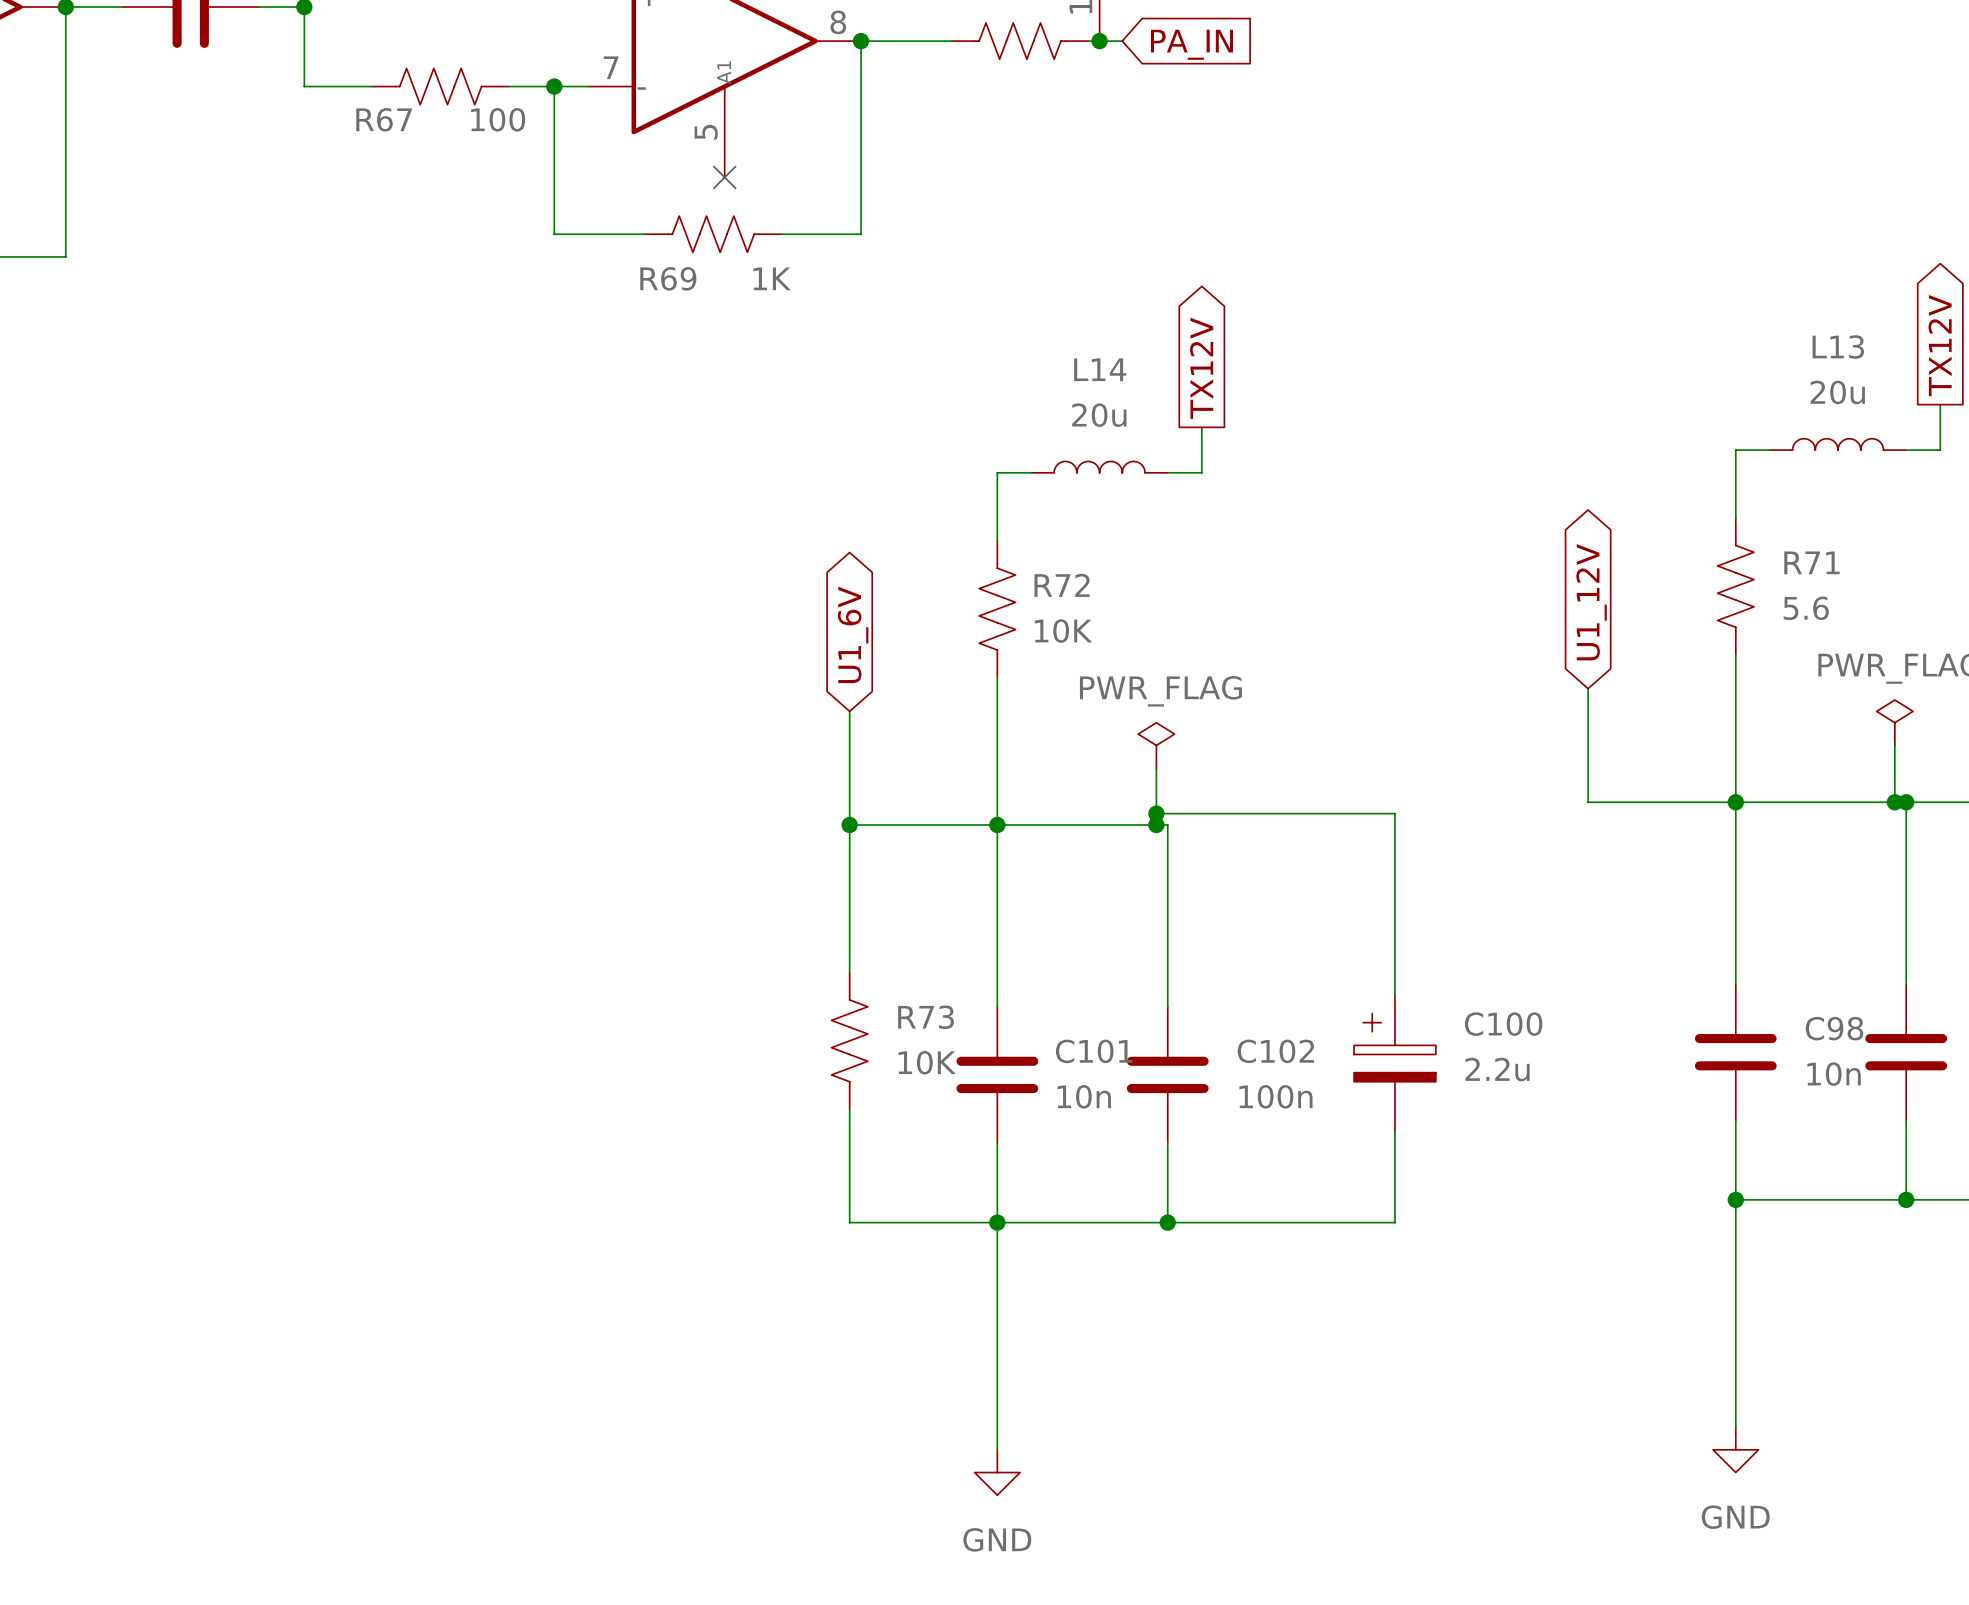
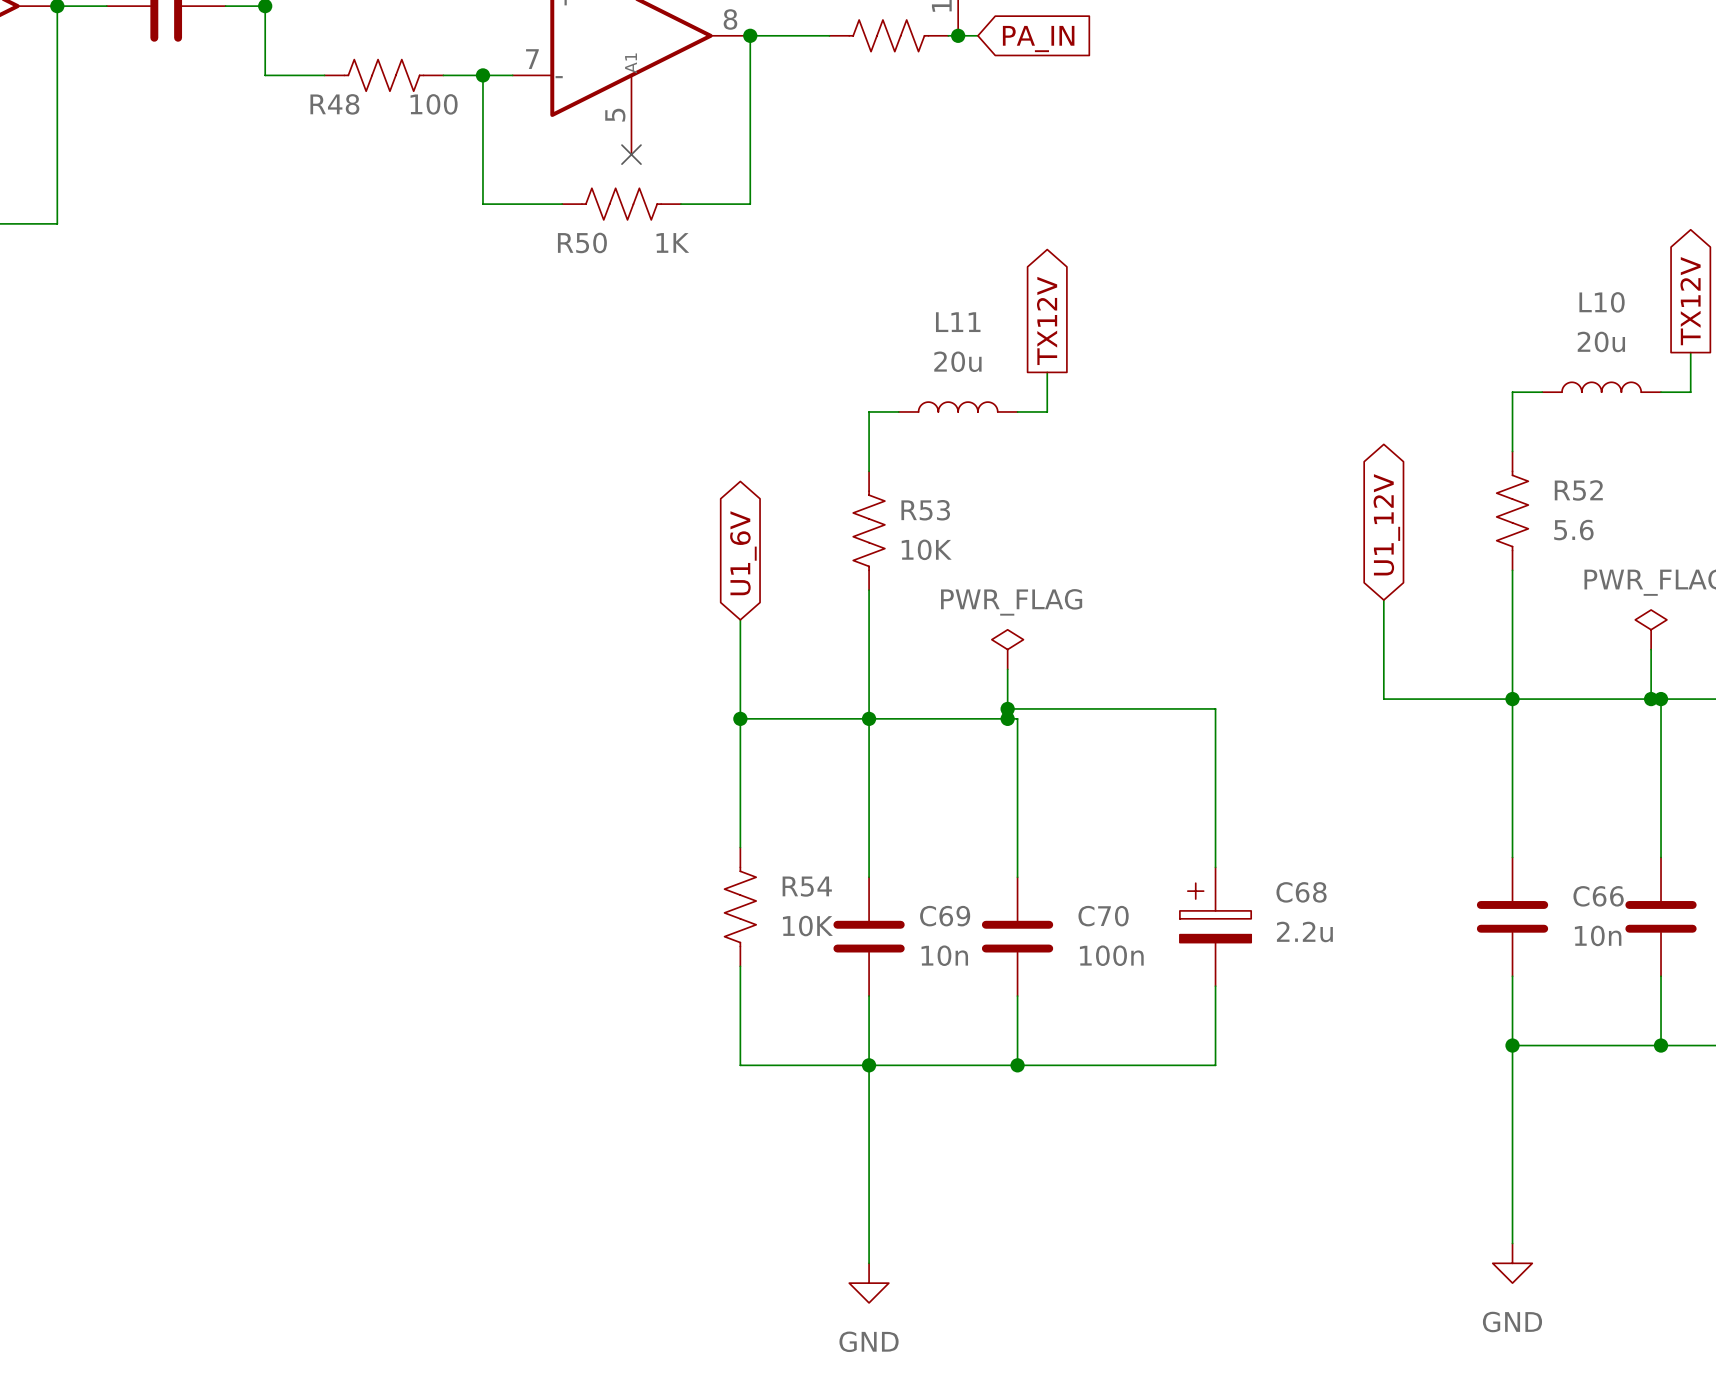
R67 name: R67 (384, 119) -> R48 (334, 104)
R69 name: R69 (668, 278) -> R50 (582, 242)
L13 name: L13 (1838, 347) -> L10 (1602, 302)
L14 name: L14 (1100, 369) -> L11 (958, 322)
R71 name: R71 (1811, 562) -> R52 (1578, 490)
R72 name: R72 (1062, 585) -> R53 (925, 510)
R73 name: R73 (926, 1017) -> R54 (807, 886)
C100 name: C100 (1503, 1024) -> C68 (1301, 892)
C98 name: C98 (1834, 1028) -> C66 (1598, 896)
C101 name: C101 (1094, 1051) -> C69 (945, 916)
C102 name: C102 (1275, 1051) -> C70 (1103, 916)

